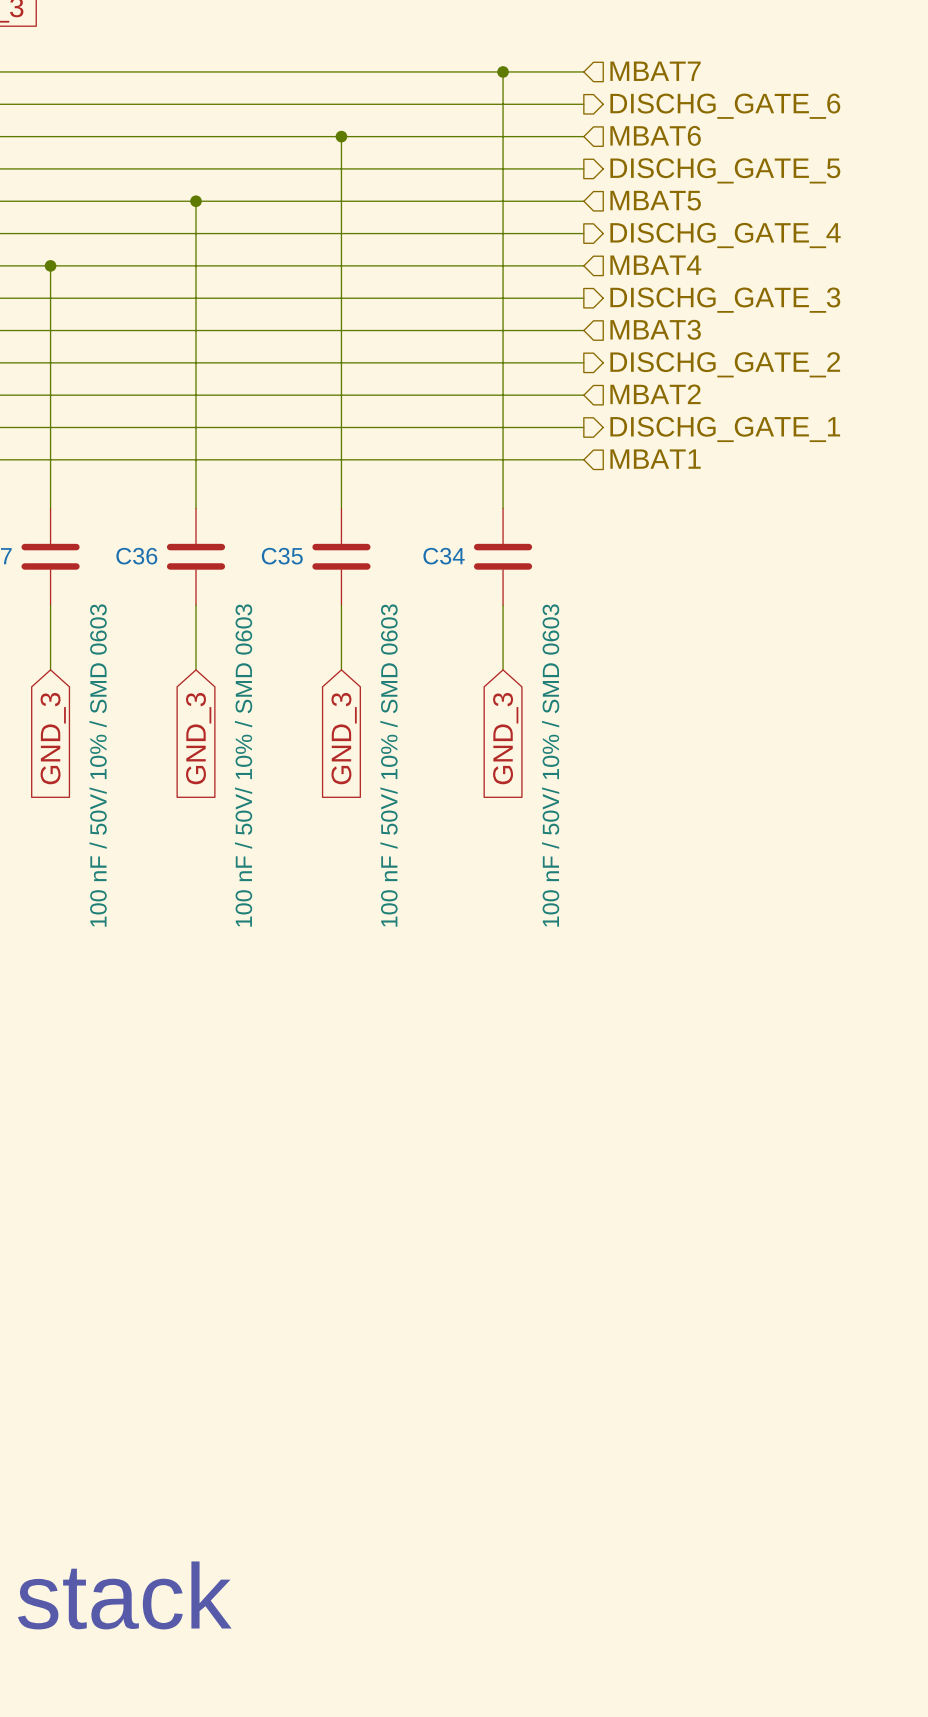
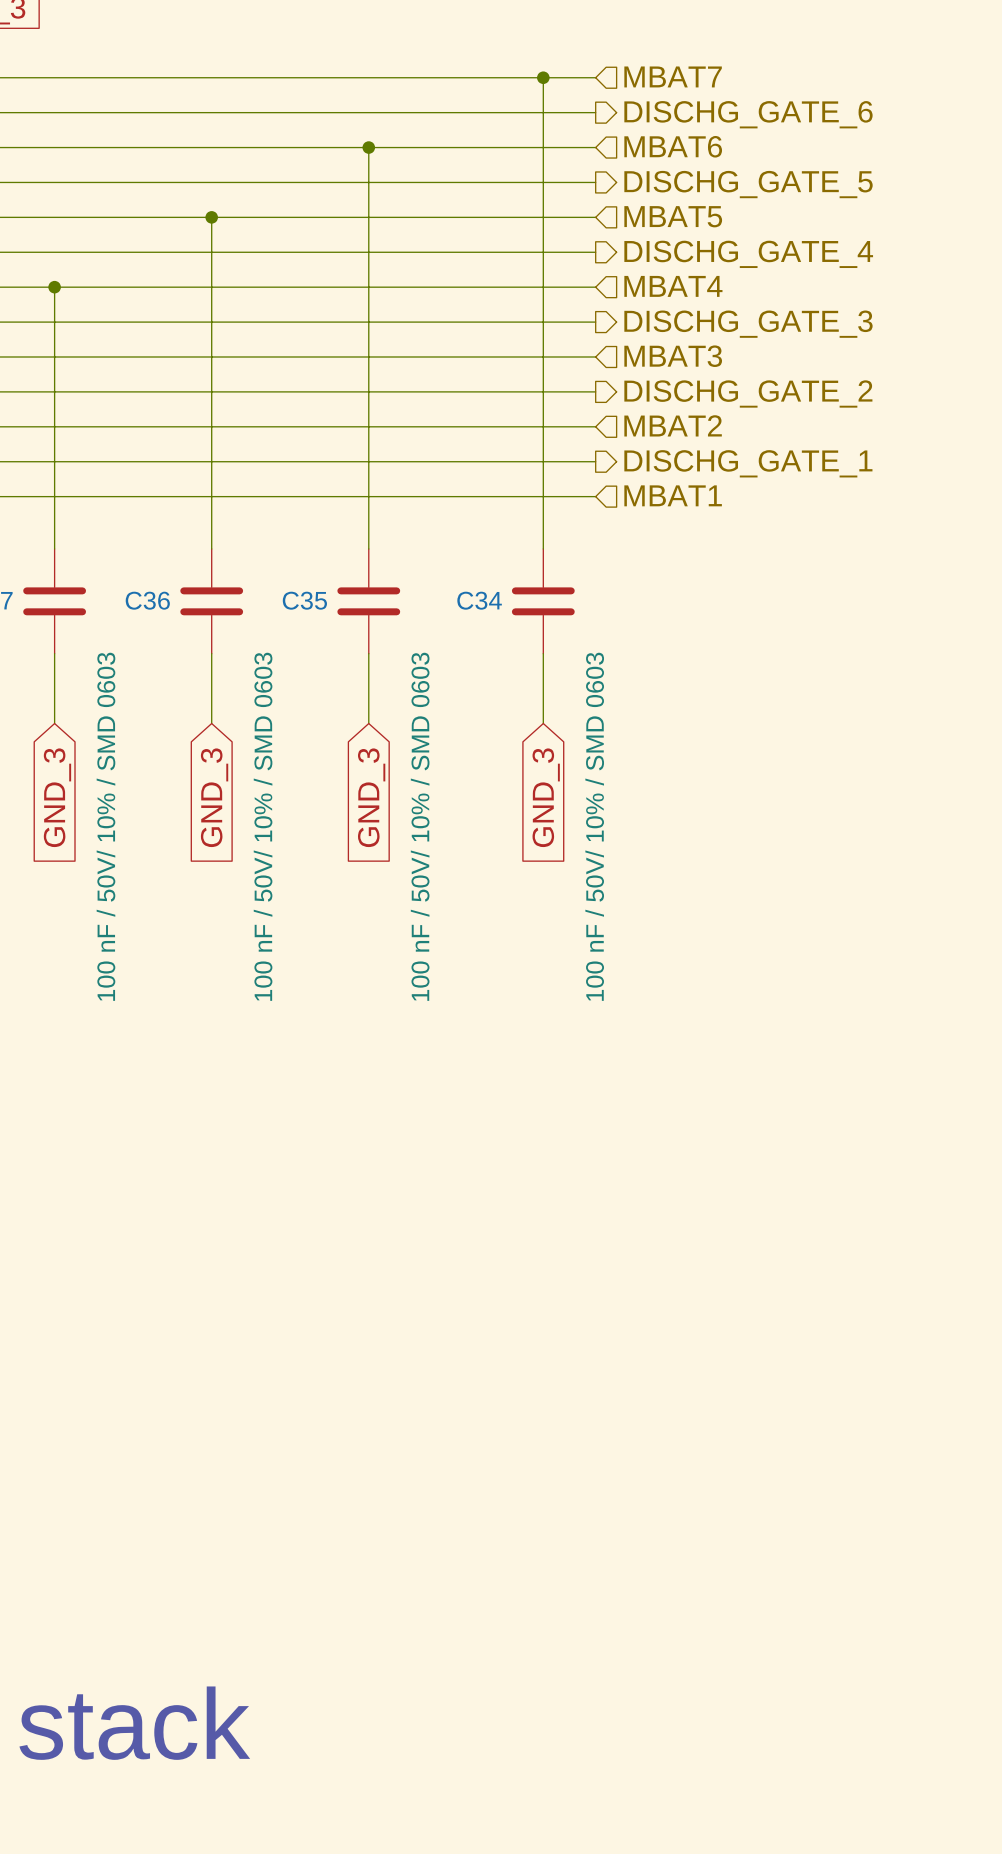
wire: (551, 71) (583, 71) -> none
hierarchical label position: MBAT7 (655, 71) -> MBAT7 (673, 76)
wire: (551, 104) (583, 104) -> none
hierarchical label position: DISCHG_GATE_6 (725, 106) -> DISCHG_GATE_6 (748, 114)
hierarchical label position: MBAT6 (655, 135) -> MBAT6 (673, 146)
wire: (551, 136) (583, 136) -> none
wire: (551, 168) (583, 168) -> none
hierarchical label position: DISCHG_GATE_5 (725, 170) -> DISCHG_GATE_5 (748, 184)
hierarchical label position: MBAT5 (655, 200) -> MBAT5 (673, 216)
wire: (551, 201) (583, 201) -> none
wire: (551, 233) (583, 233) -> none
hierarchical label position: DISCHG_GATE_4 (725, 235) -> DISCHG_GATE_4 (748, 254)
wire: (551, 265) (583, 265) -> none
hierarchical label position: MBAT4 (655, 265) -> MBAT4 (673, 286)
wire: (551, 298) (583, 298) -> none
hierarchical label position: DISCHG_GATE_3 (725, 300) -> DISCHG_GATE_3 (748, 324)
hierarchical label position: MBAT3 (655, 329) -> MBAT3 (673, 356)
wire: (551, 330) (583, 330) -> none
wire: (551, 362) (583, 362) -> none
hierarchical label position: DISCHG_GATE_2 (725, 364) -> DISCHG_GATE_2 (748, 393)
hierarchical label position: MBAT2 (655, 394) -> MBAT2 (673, 425)
wire: (551, 395) (583, 395) -> none
wire: (551, 427) (583, 427) -> none
hierarchical label position: DISCHG_GATE_1 (725, 429) -> DISCHG_GATE_1 (748, 463)
wire: (551, 459) (583, 459) -> none
hierarchical label position: MBAT1 (655, 459) -> MBAT1 (673, 495)

